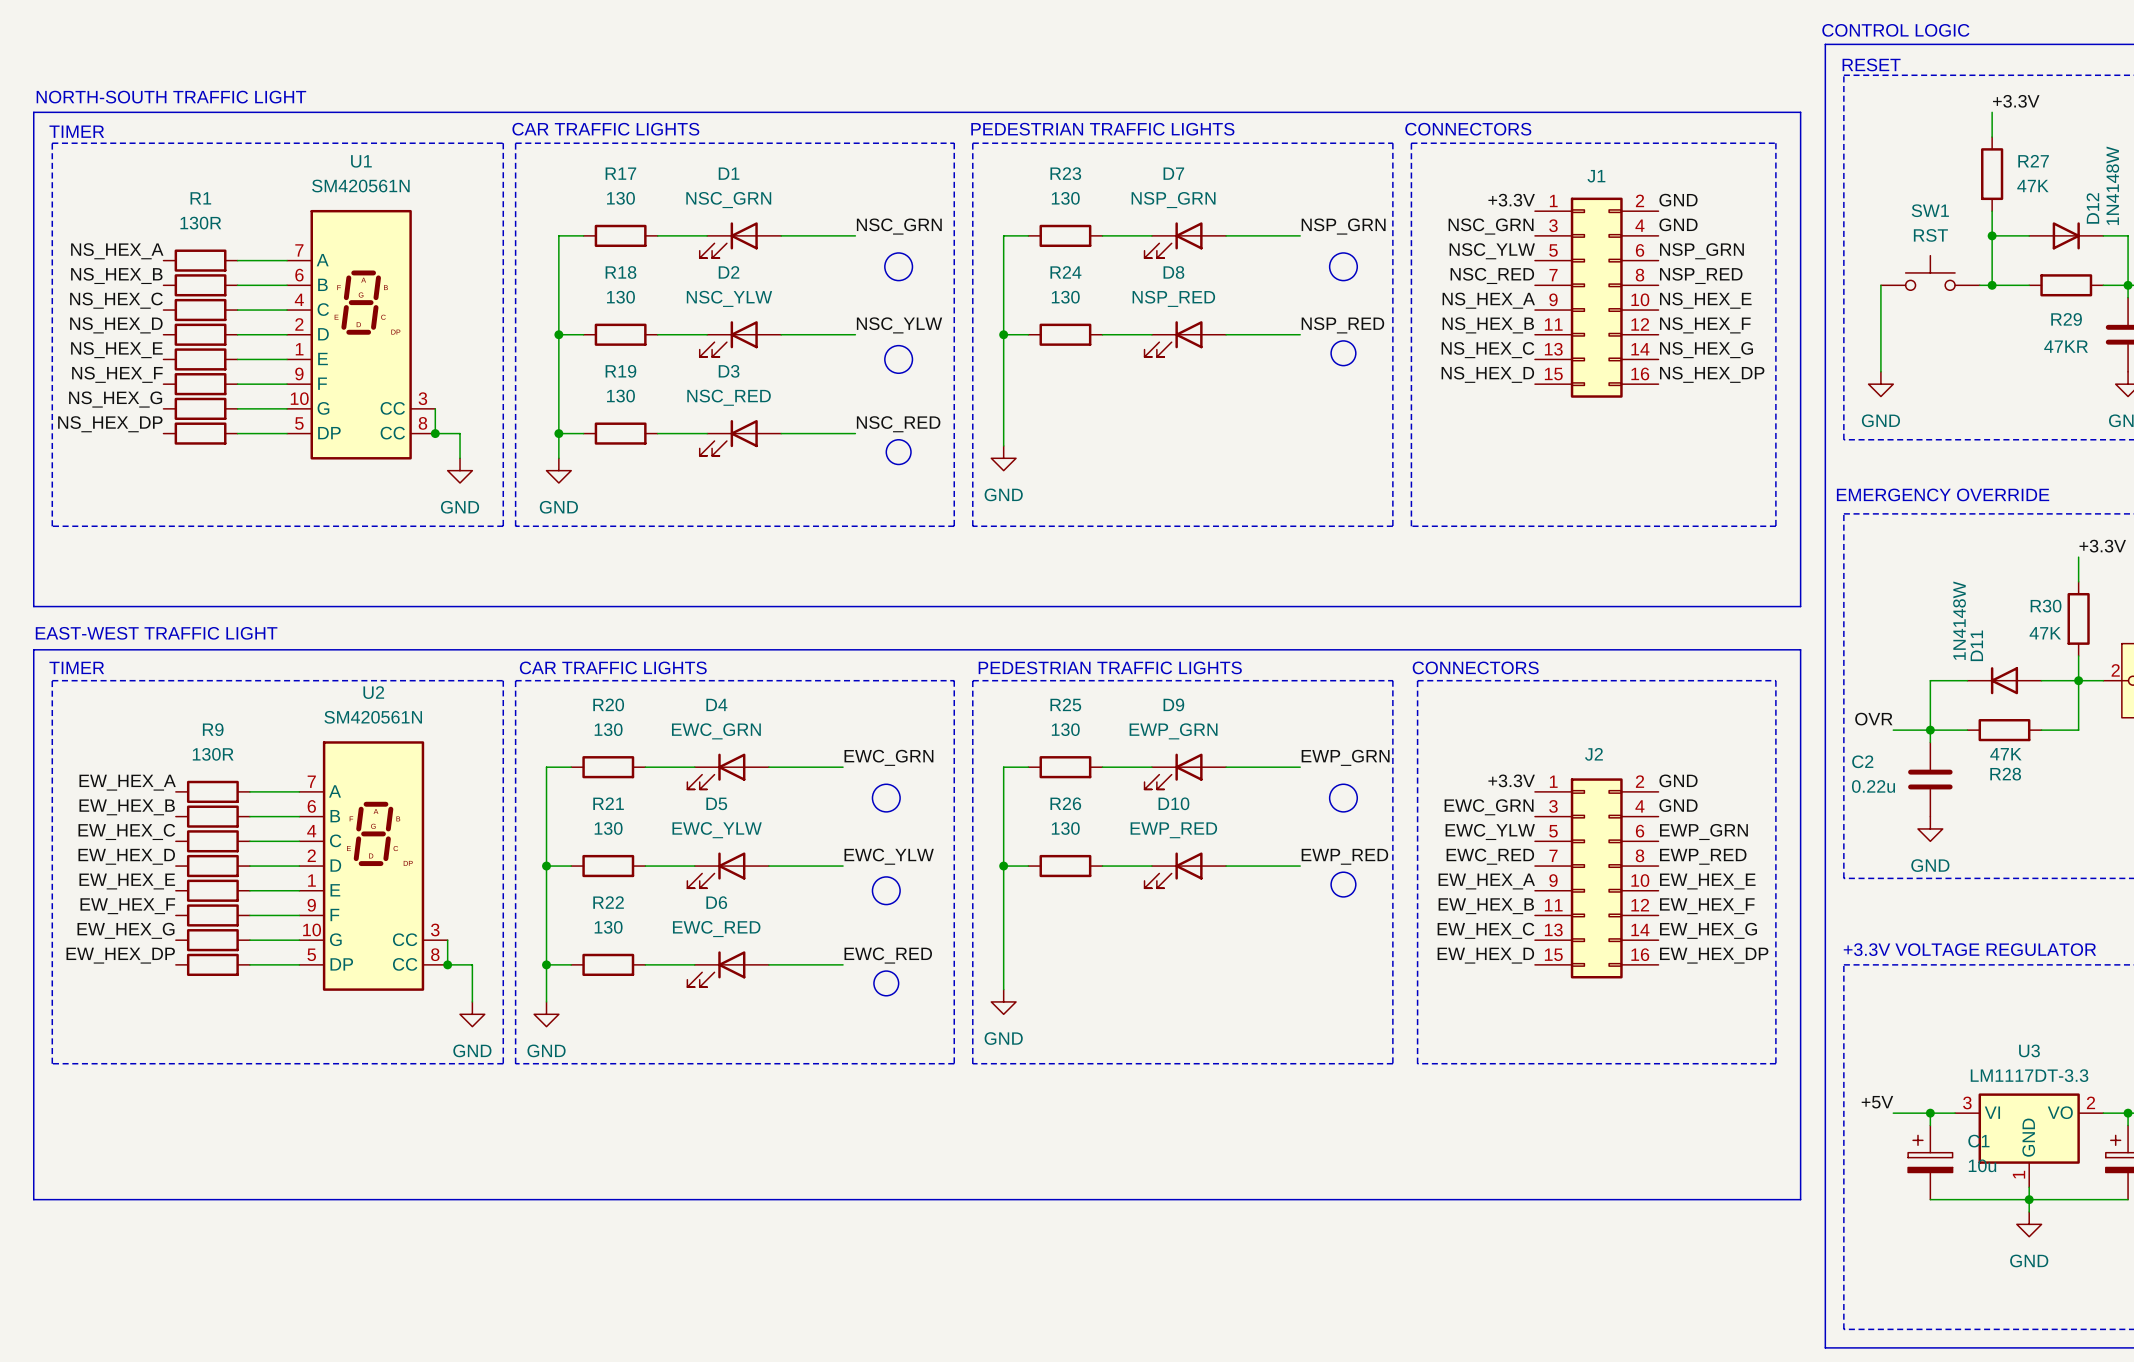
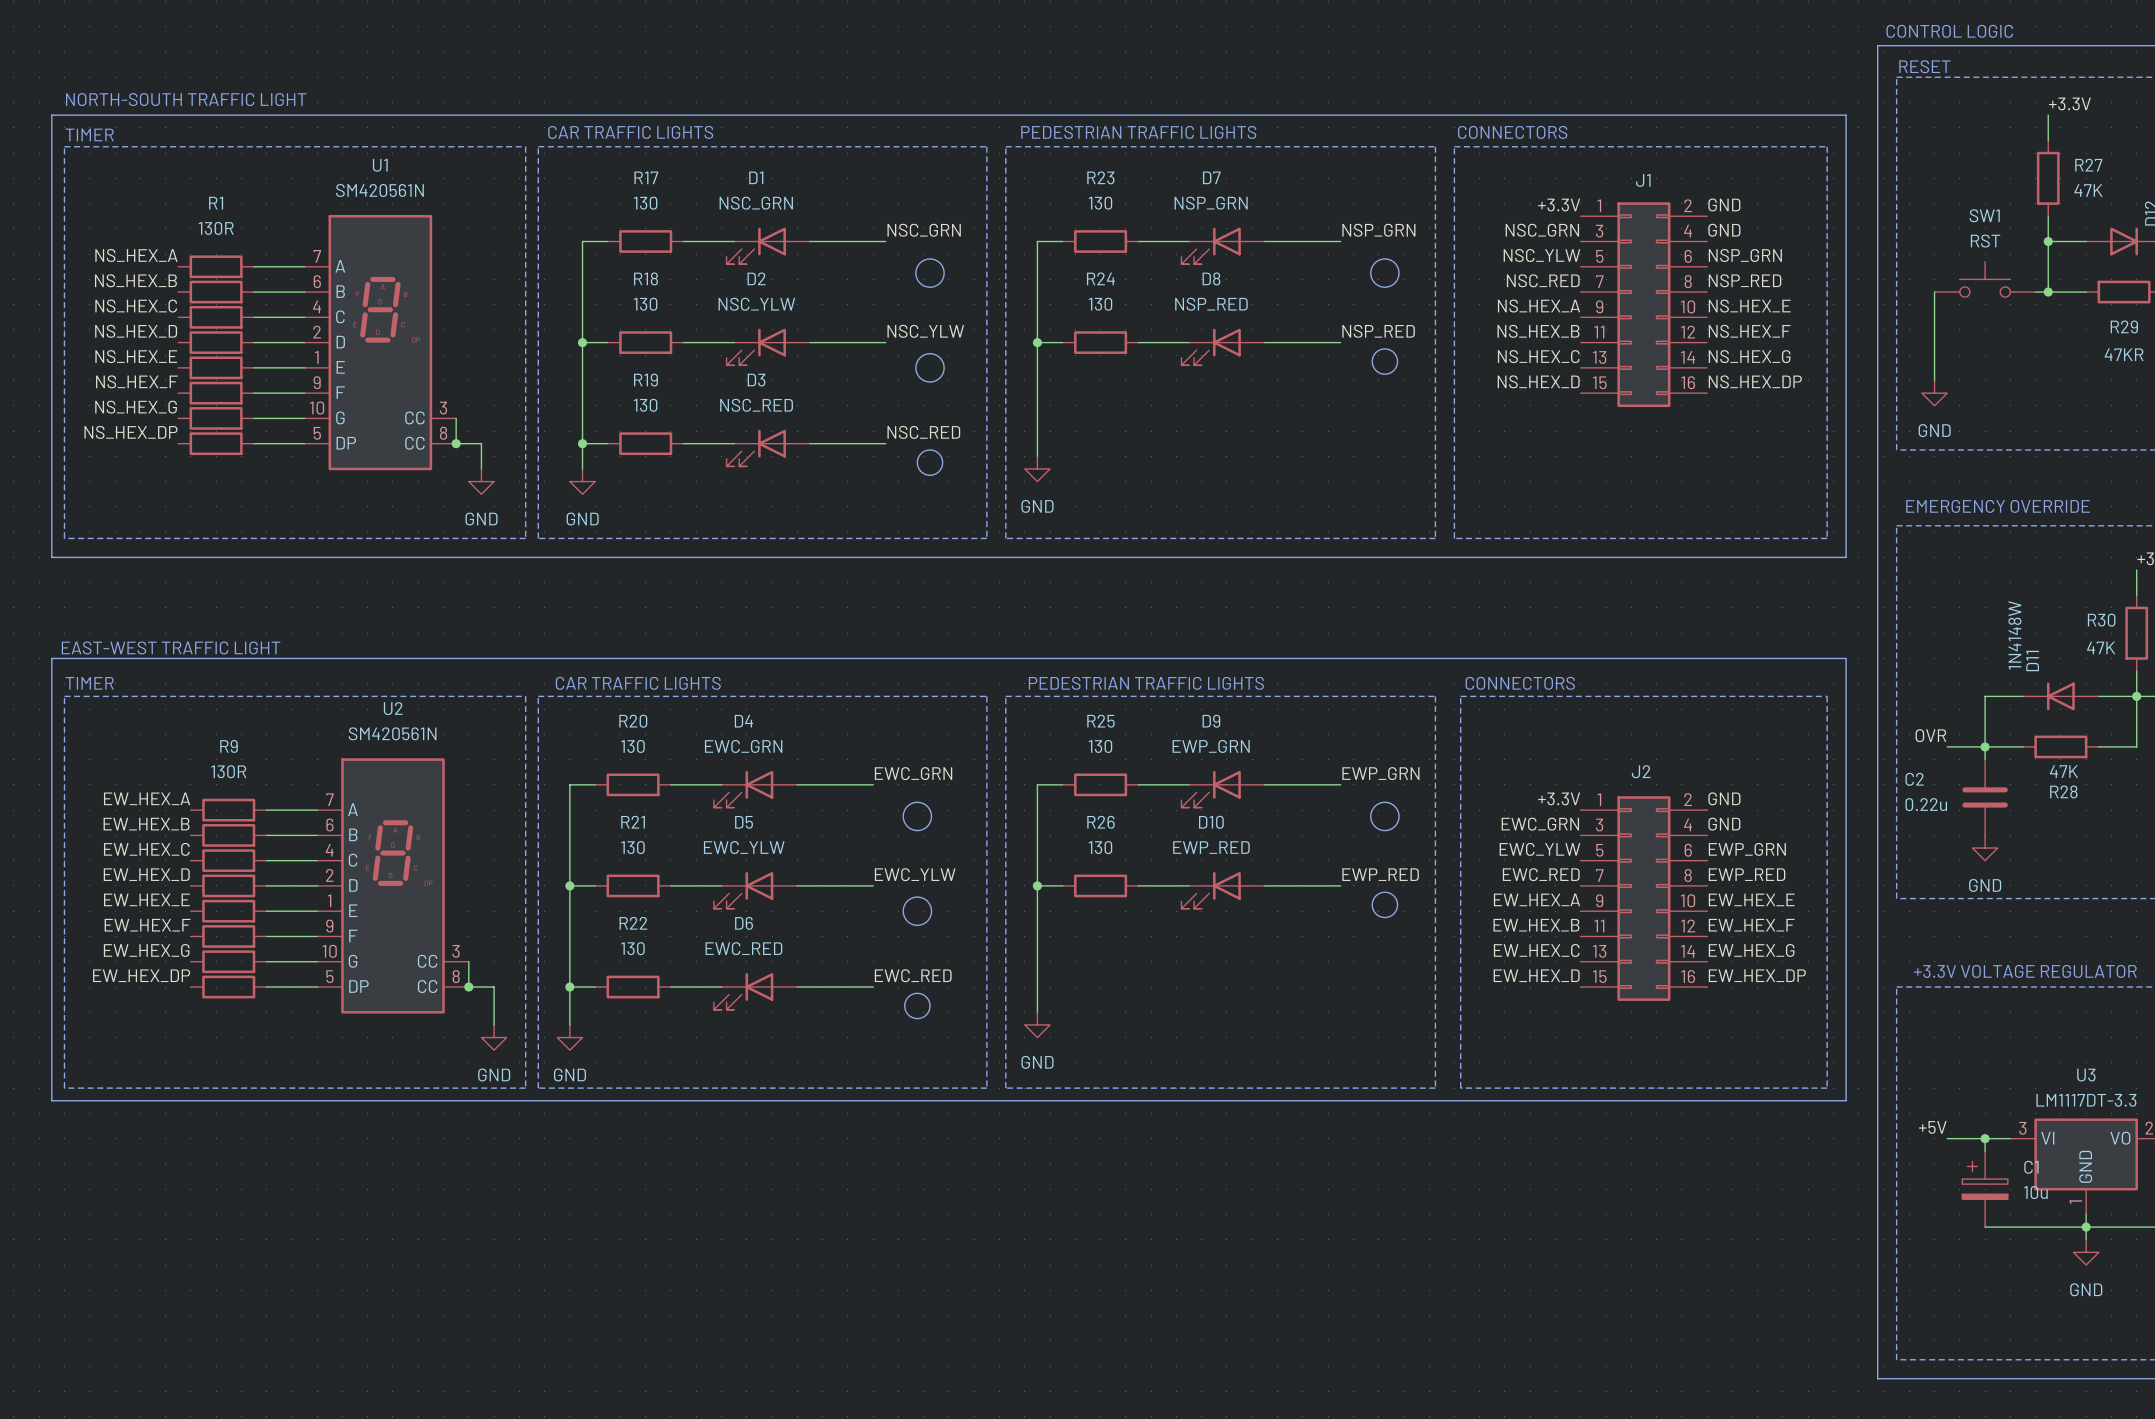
line: (39, 112) (33, 112) (33, 606) (1800, 606) (1800, 112) (1794, 112) -> (51, 115) (51, 557) (1846, 557) (1846, 115)
line: (33, 649) (33, 1199) (1800, 1199) (1800, 649) (33, 649) -> (51, 658) (51, 1100) (1846, 1100) (1846, 658) (51, 658)

